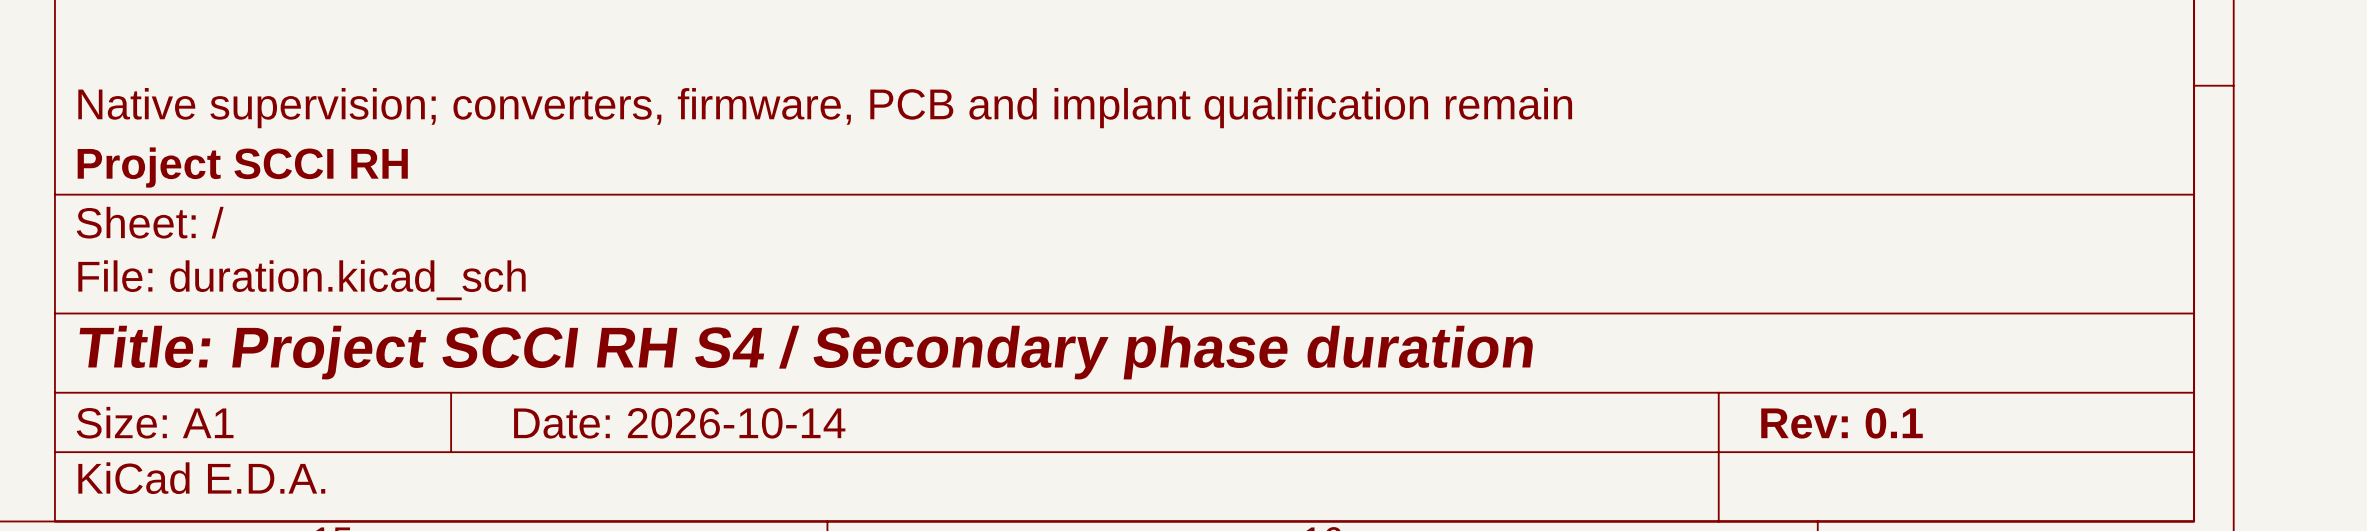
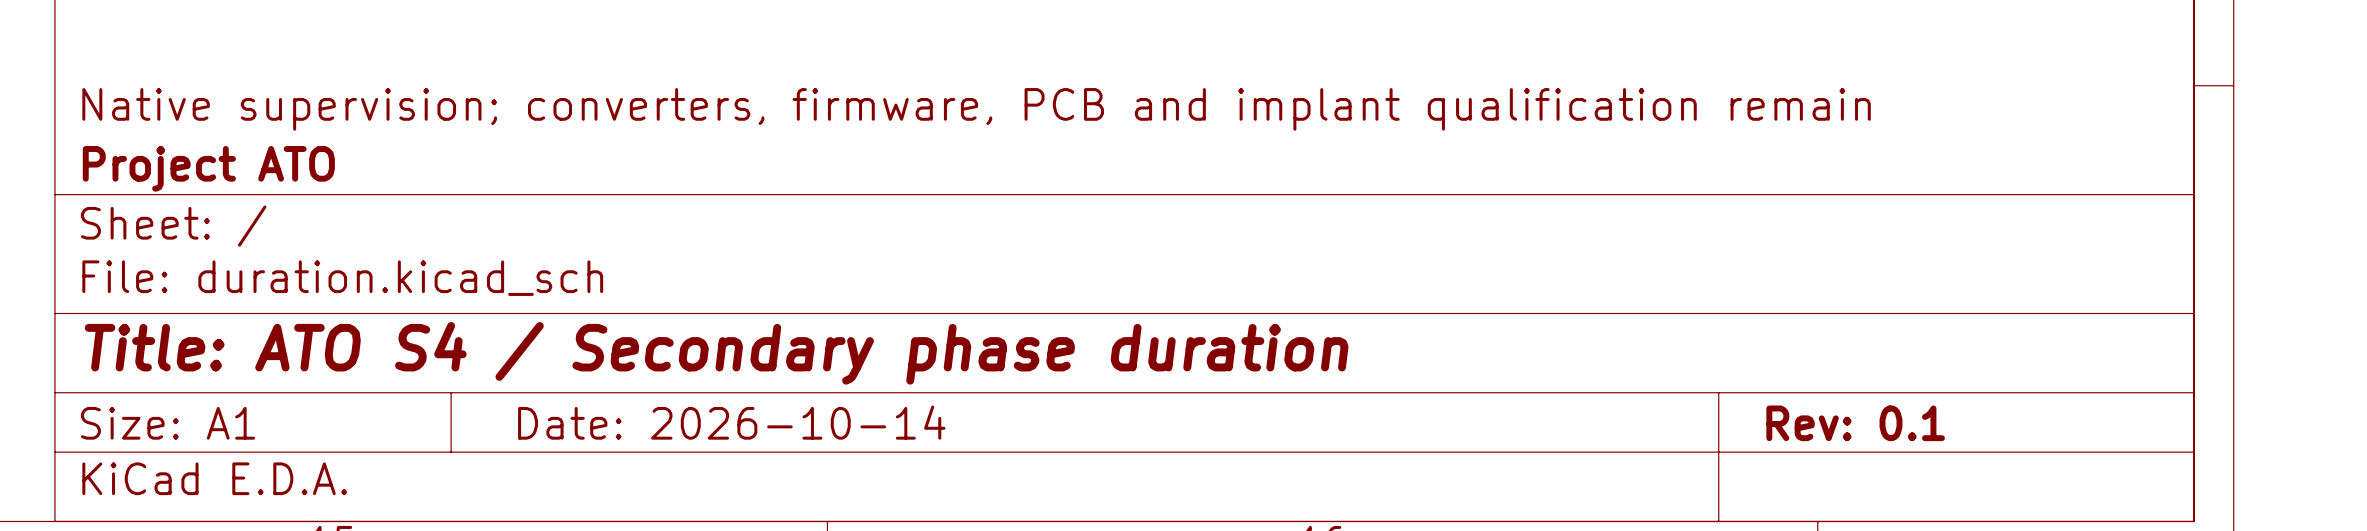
title block: Project SCCI RH (242, 167) -> Project ATO (208, 168)
title block: Title: Project SCCI RH S4 / Secondary phase duration (806, 352) -> Title: ATO S4 / Secondary phase duration (716, 353)

